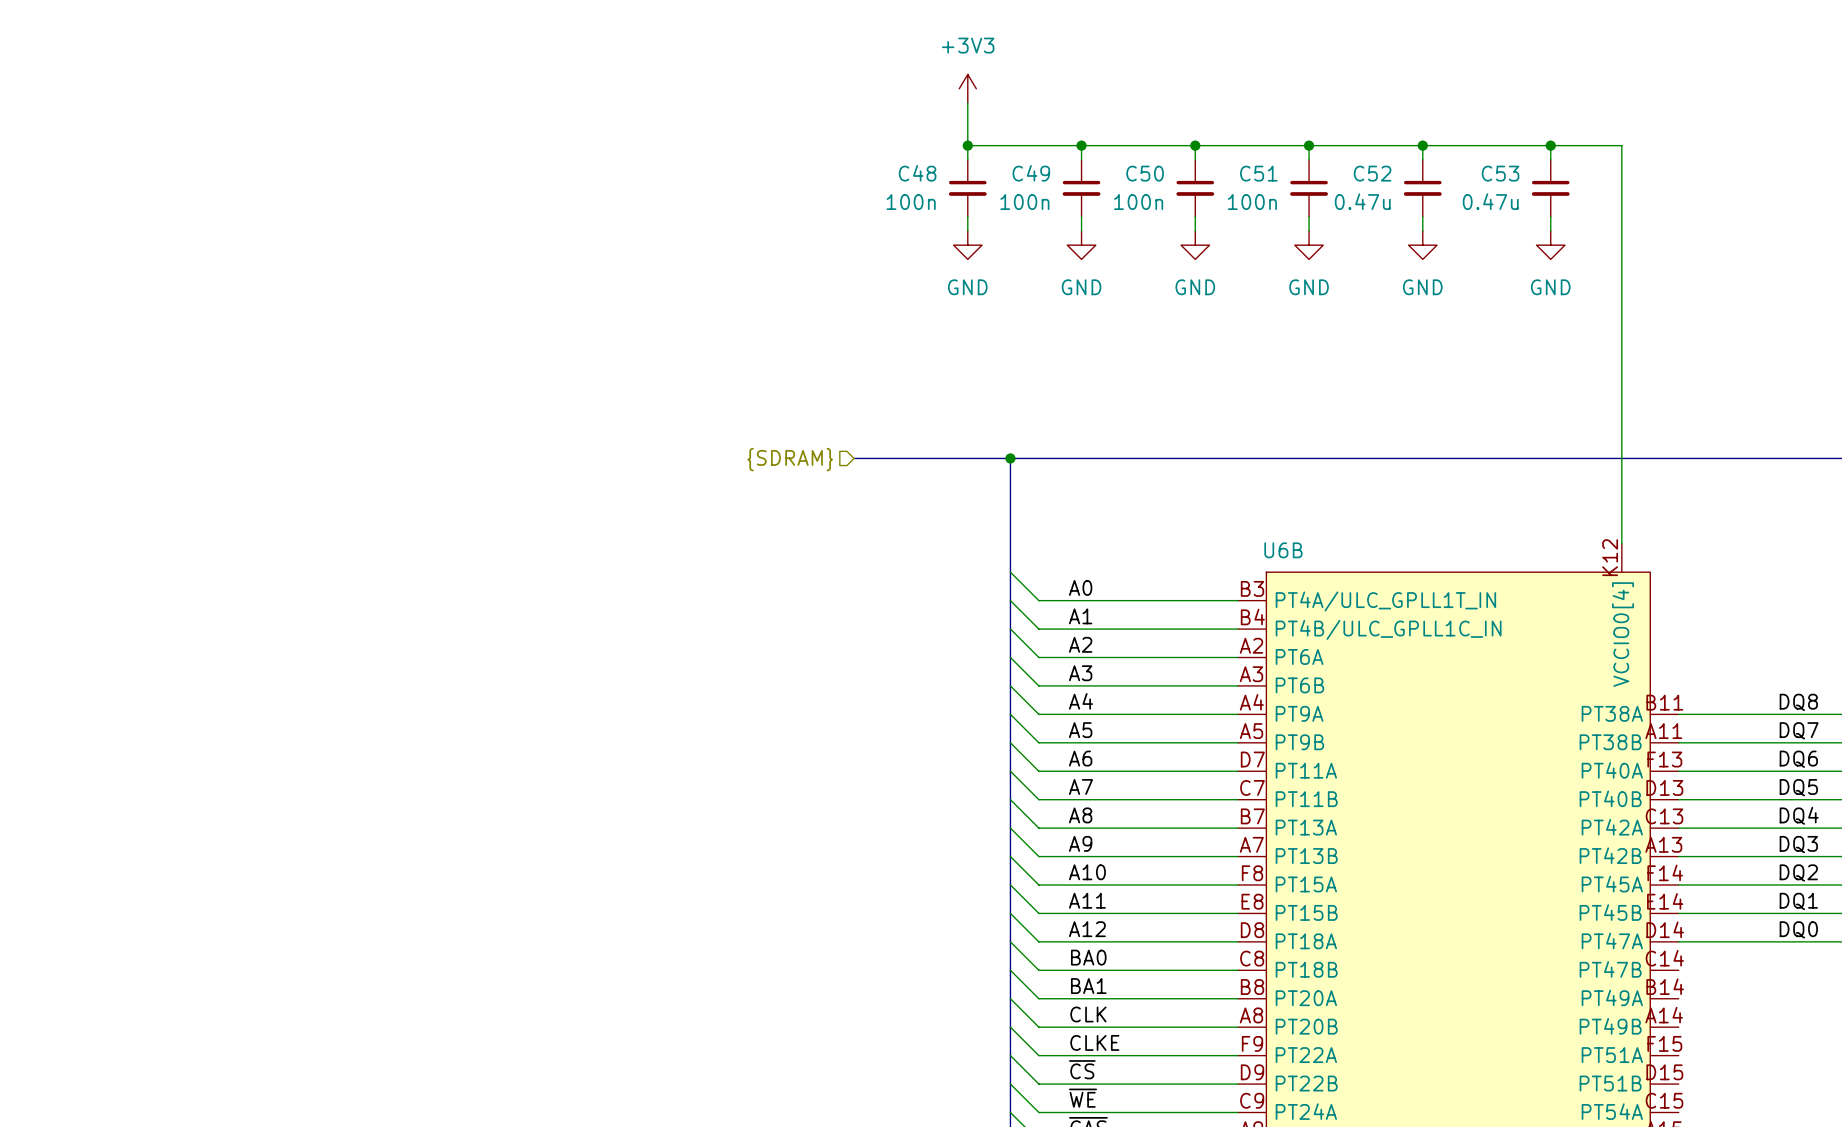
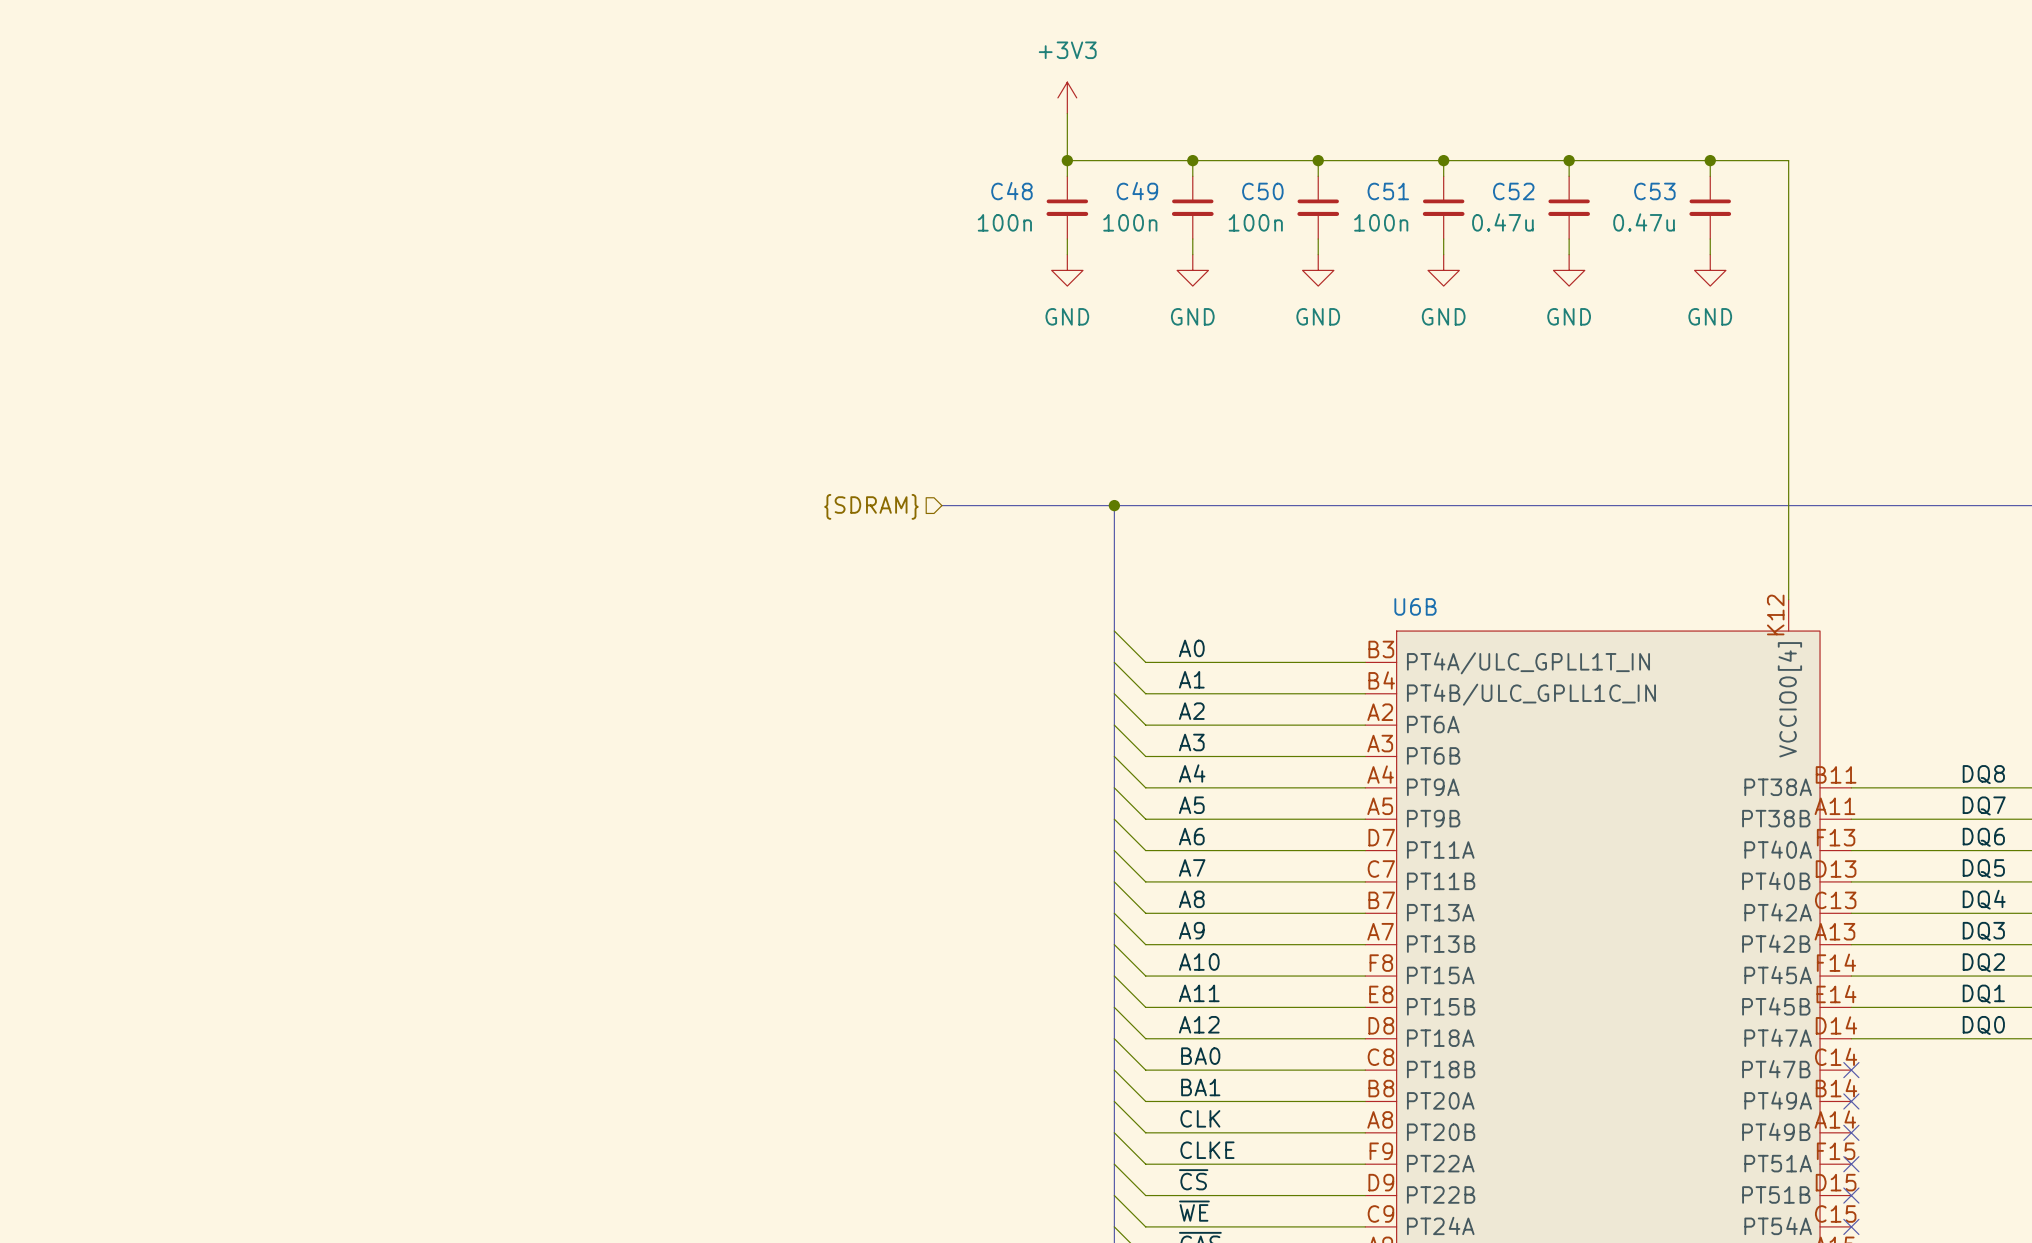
no-connect mark: none -> (1851, 1070)
no-connect mark: none -> (1851, 1101)
no-connect mark: none -> (1851, 1132)
no-connect mark: none -> (1851, 1164)
no-connect mark: none -> (1851, 1195)
no-connect mark: none -> (1851, 1226)

